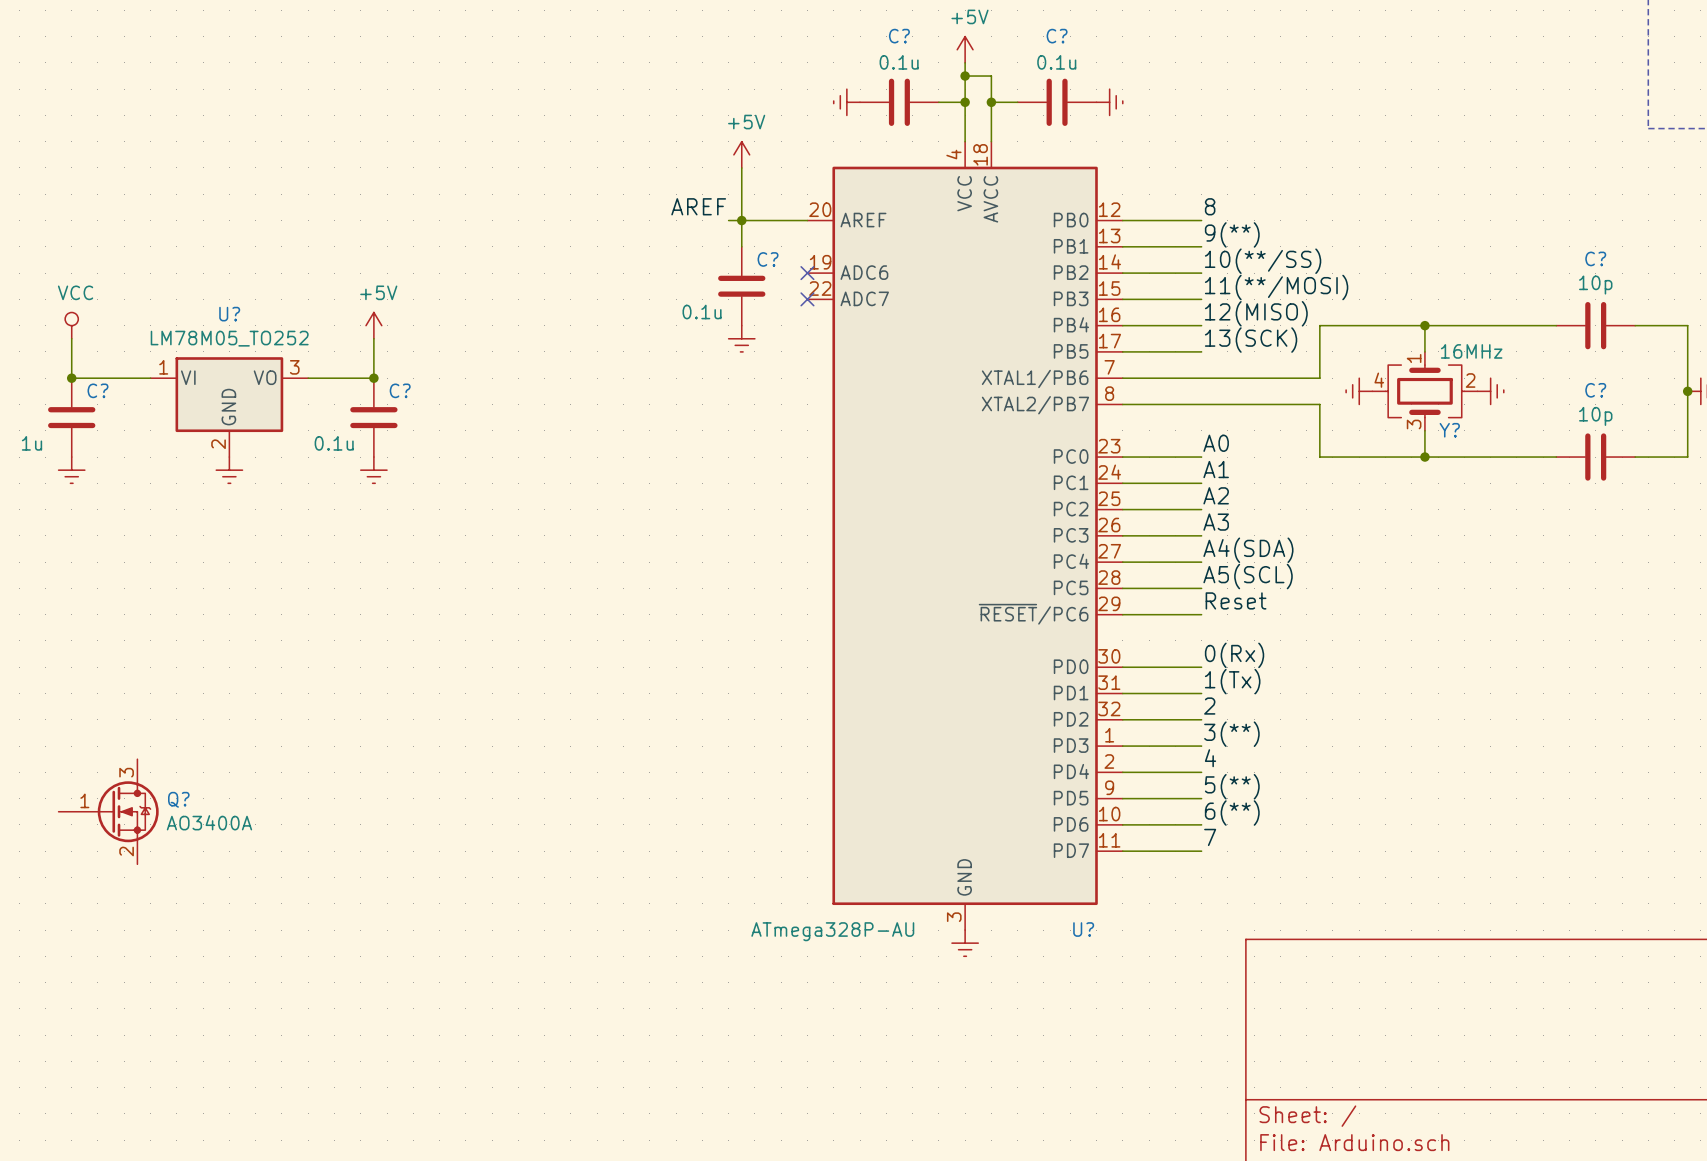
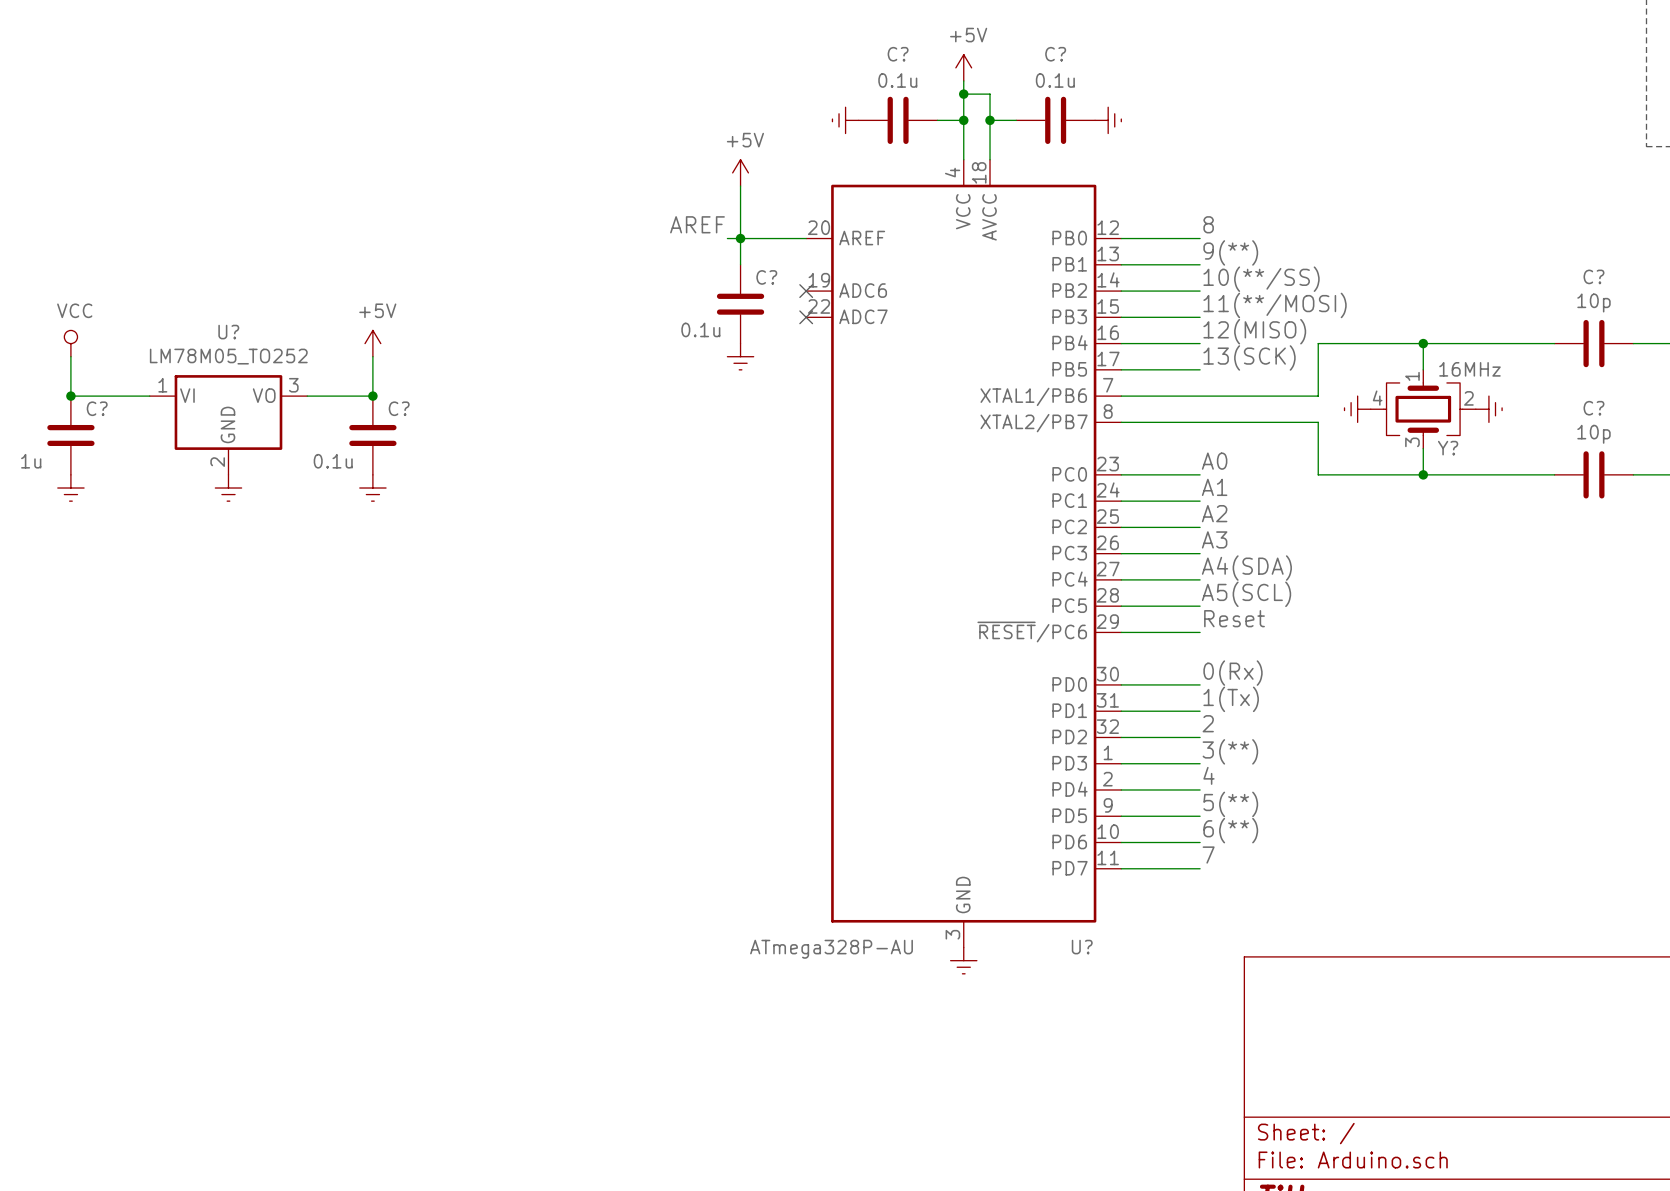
Q?: AO3400A (108, 811) -> none

